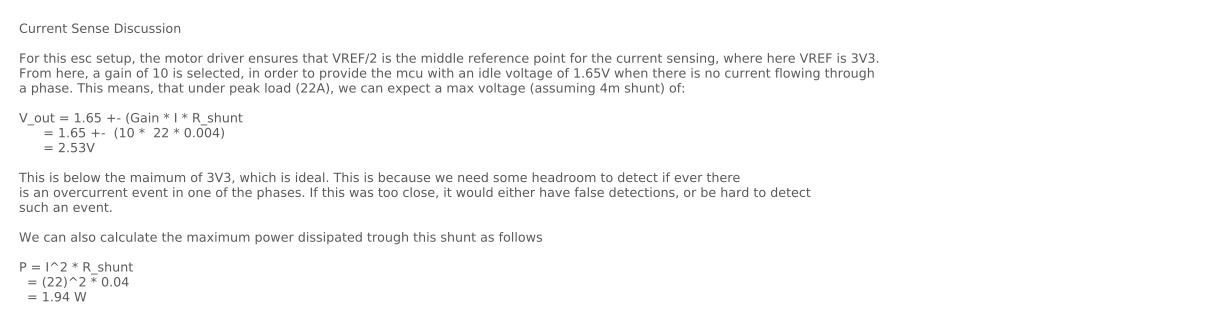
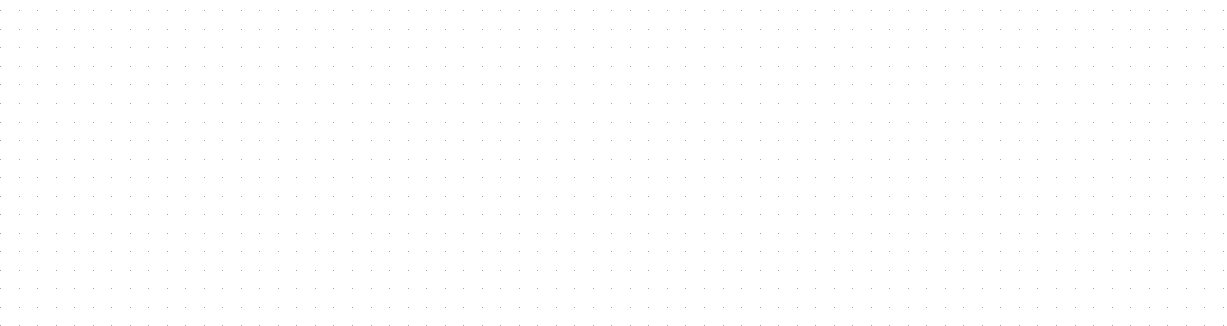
text: Current Sense Discussion (99, 28) -> none
text: For this esc setup, the motor driver ensures that VREF/2 is the middle reference point for the current sensing, where here VREF is 3V3. (449, 59) -> none
text: From here, a gain of 10 is selected, in order to provide the mcu with an idle voltage of 1.65V when there is no current flowing through (446, 74) -> none
text: a phase. This means, that under peak load (22A), we can expect a max voltage (assuming 4m shunt) of: (351, 89) -> none
text: V_out = 1.65 +- (Gain * I * R_shunt (130, 119) -> none
text: = 1.65 +- (10 * 22 * 0.004) (134, 133) -> none
text: = 2.53V (69, 147) -> none
text: This is below the maimum of 3V3, which is ideal. This is because we need some headroom to detect if ever there (379, 177) -> none
text: is an overcurrent event in one of the phases. If this was too close, it would either have false detections, or be hard to detect (415, 193) -> none
text: such an event. (65, 207) -> none
text: We can also calculate the maximum power dissipated trough this shunt as follows (280, 238) -> none
text: P = I^2 * R_shunt (76, 268) -> none
text: = (22)^2 * 0.04 (78, 282) -> none
text: = 1.94 W (57, 296) -> none

